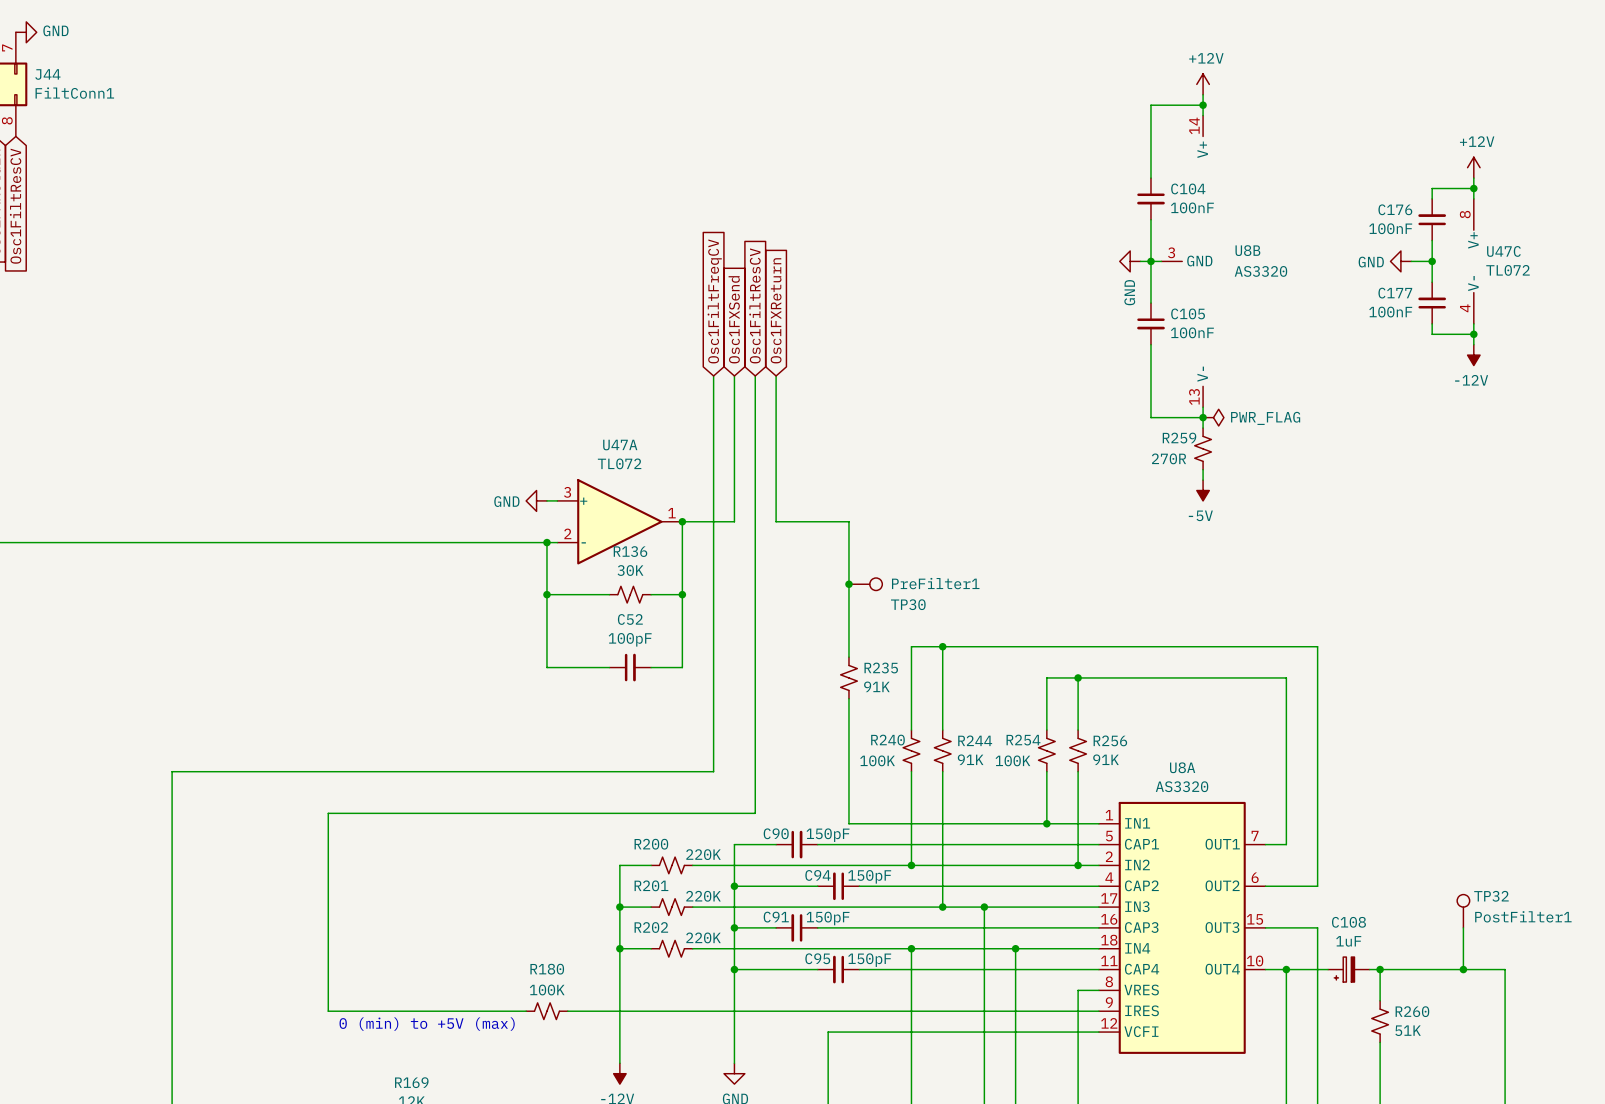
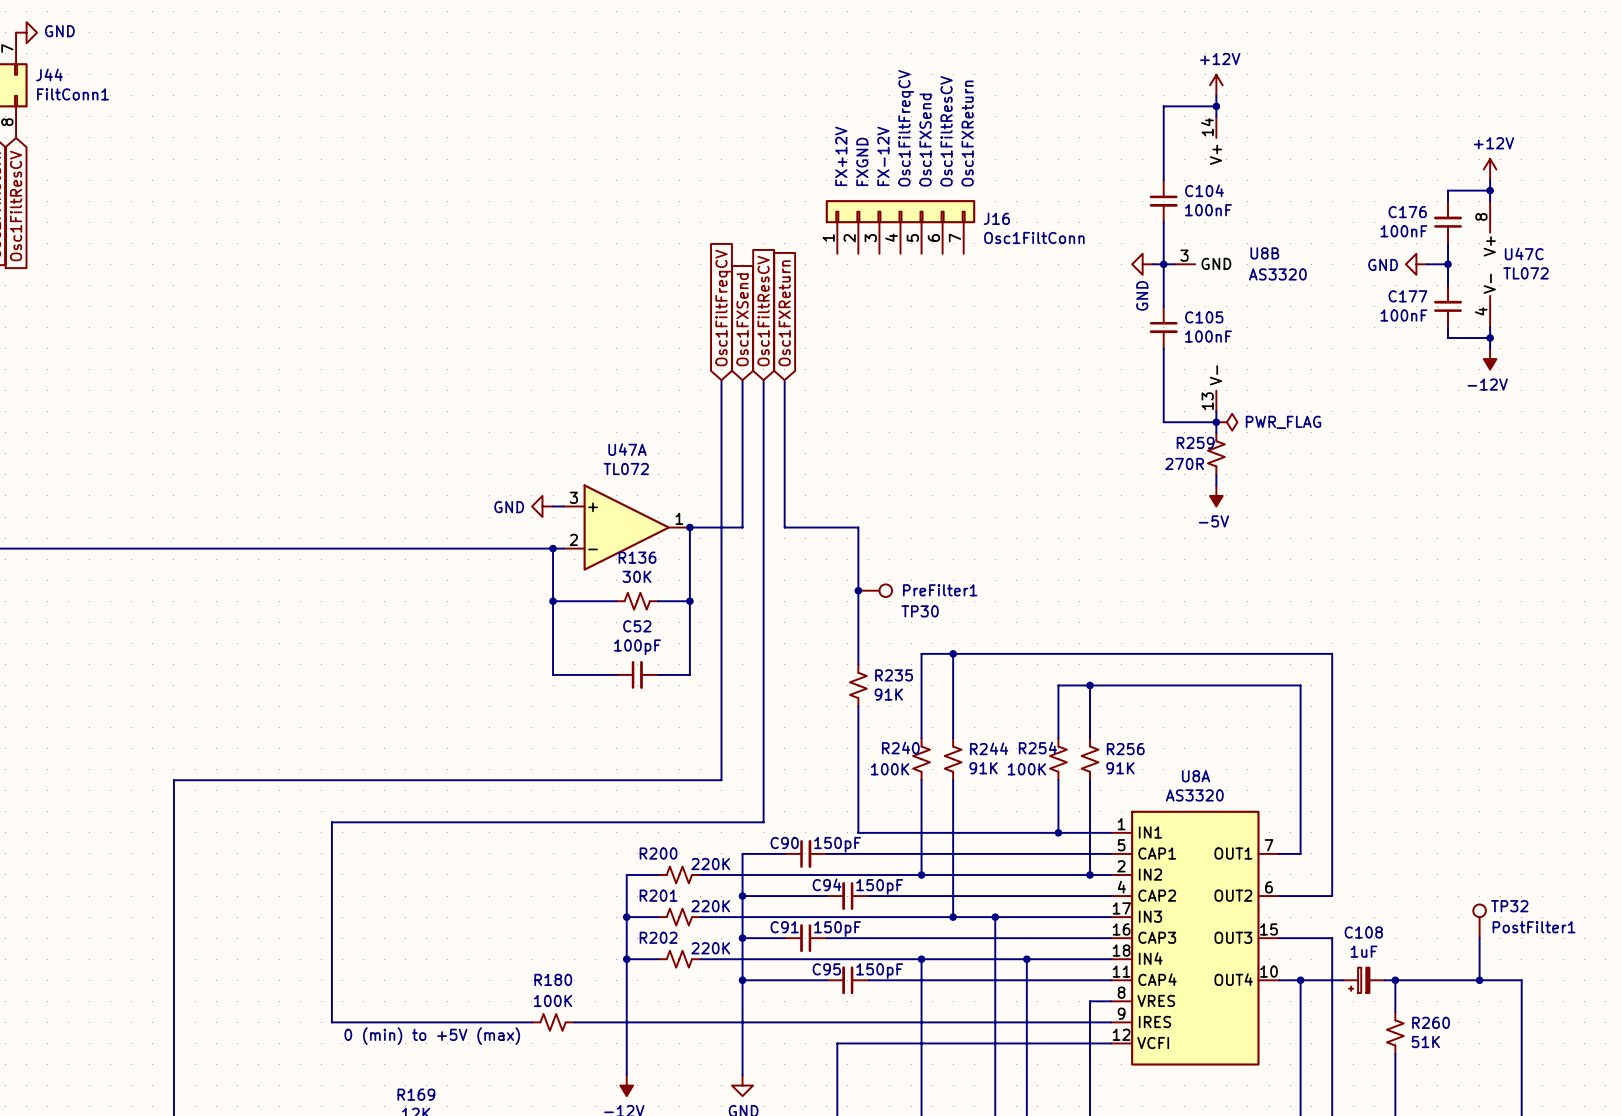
text: none -> Osc1FiltFreqCV (906, 128)
text: none -> Osc1FiltResCV (946, 131)
text: none -> Osc1FXReturn (967, 133)
text: none -> Osc1FXSend (925, 140)
text: none -> FX+12V (841, 156)
text: none -> FX-12V (883, 156)
text: none -> FXGND (862, 161)
J16: none -> Osc1FiltConn (900, 226)

